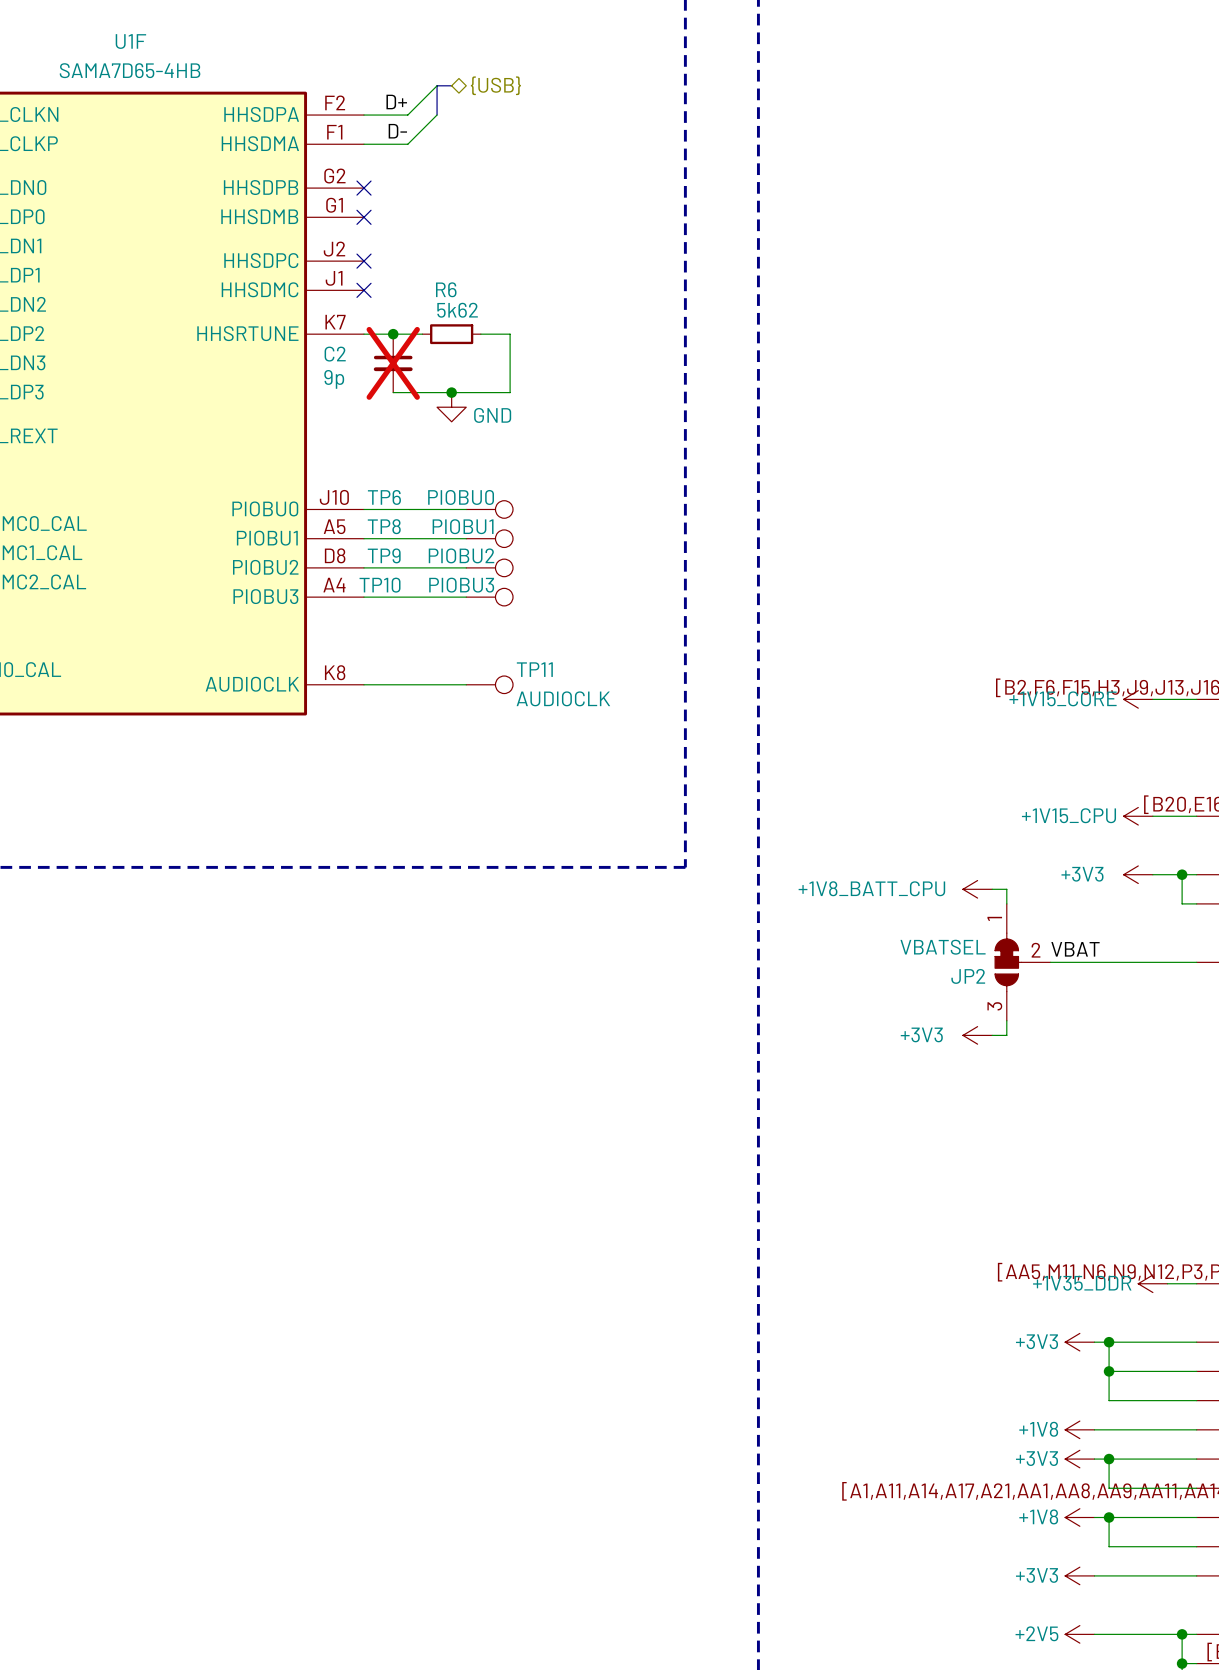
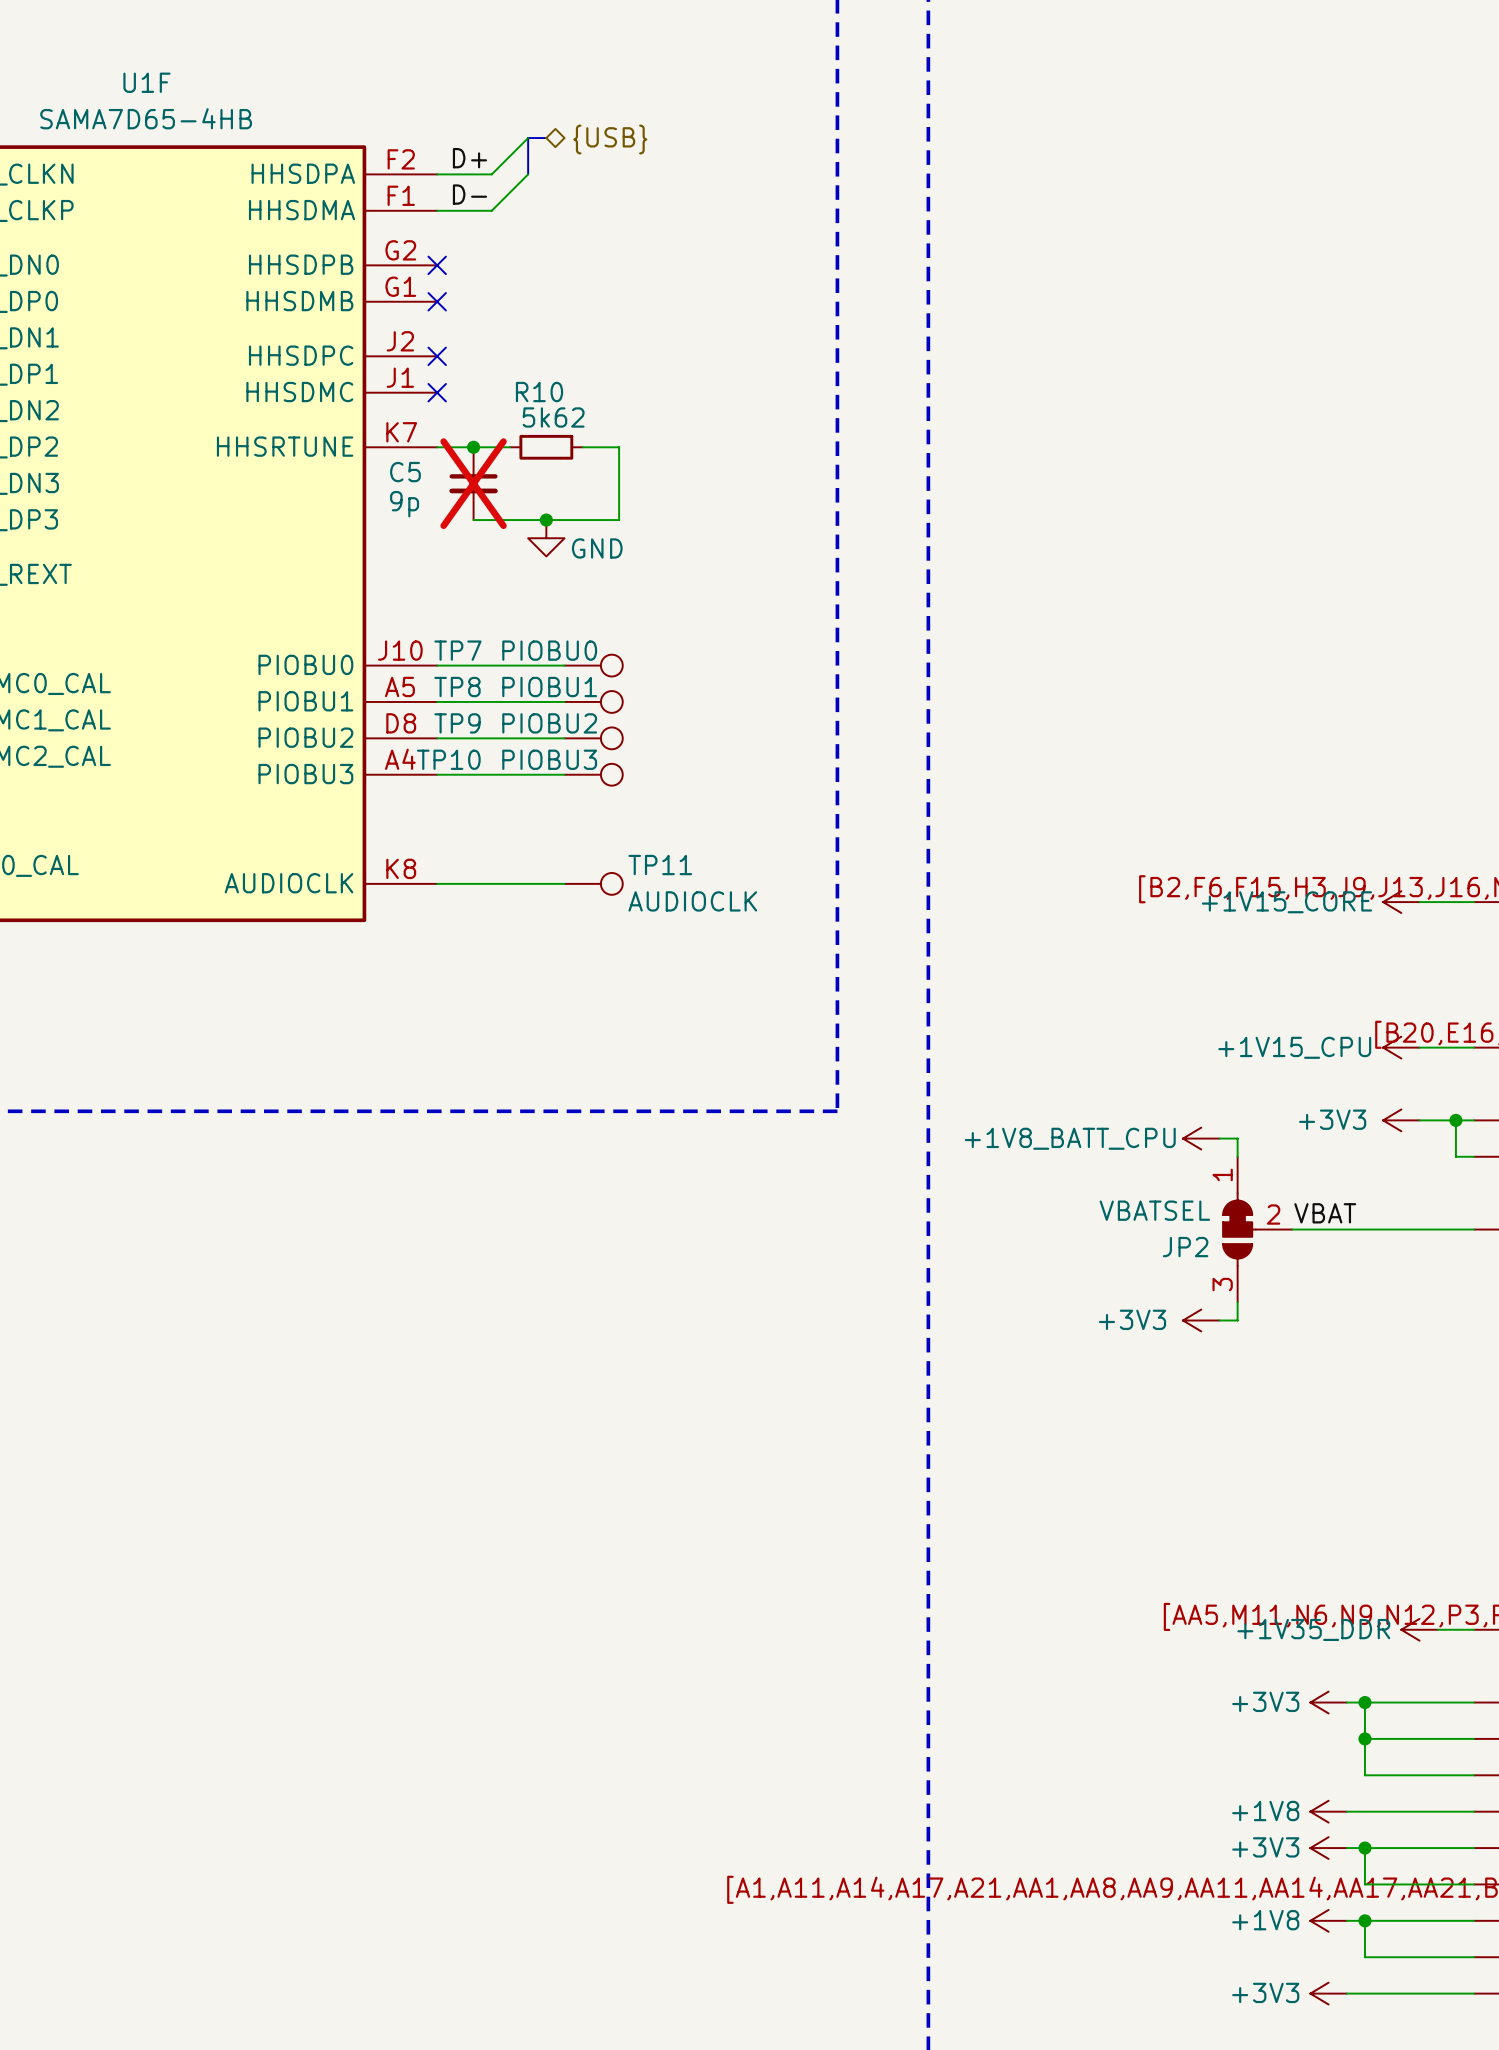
R6 name: R6 (446, 289) -> R10 (539, 392)
C2 name: C2 (335, 354) -> C5 (405, 472)
TP6 name: TP6 (384, 497) -> TP7 (457, 650)

